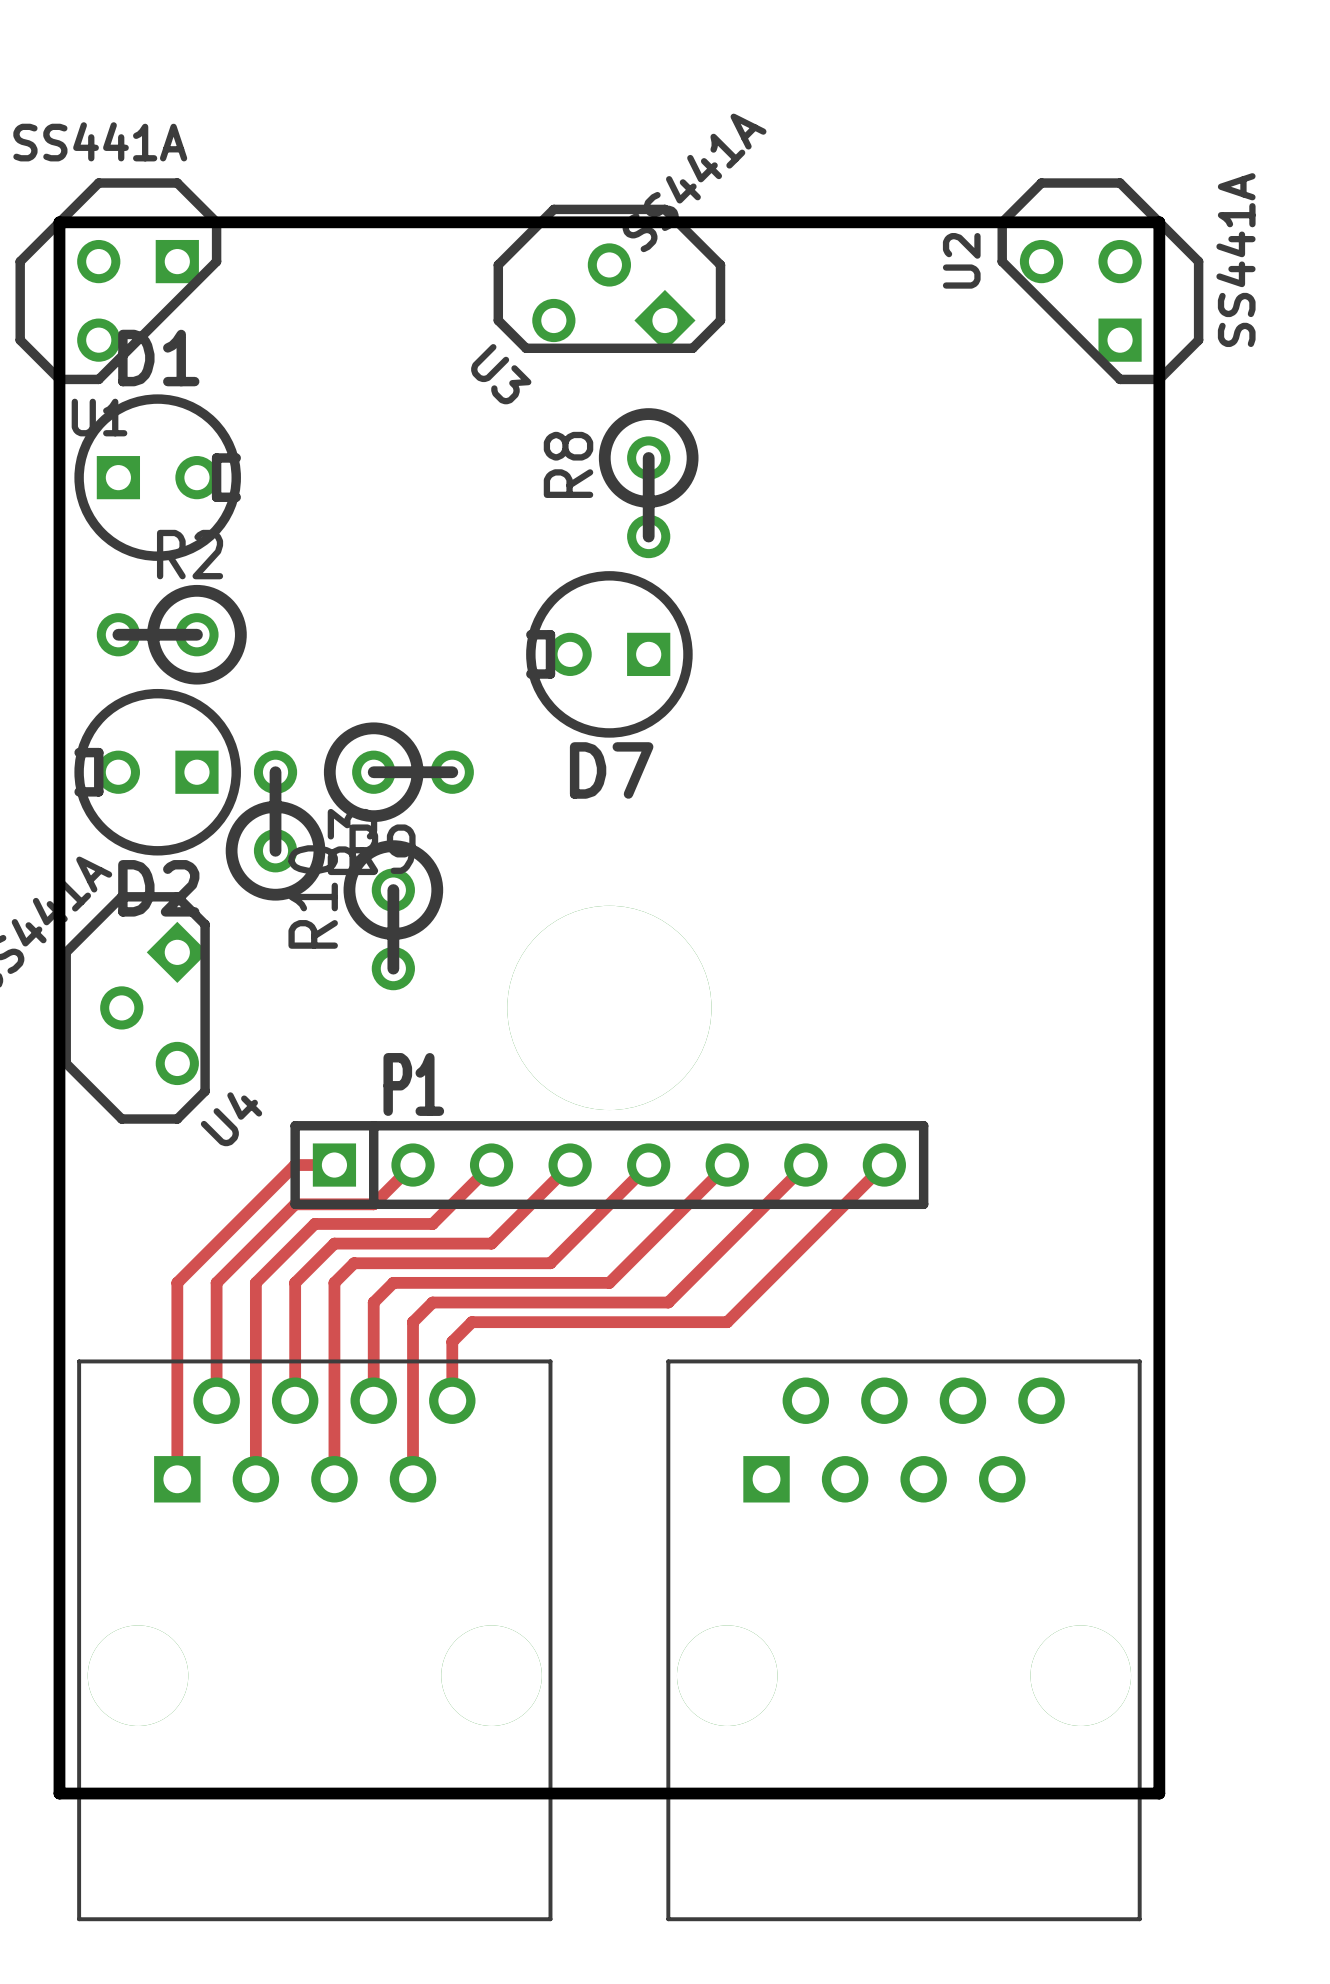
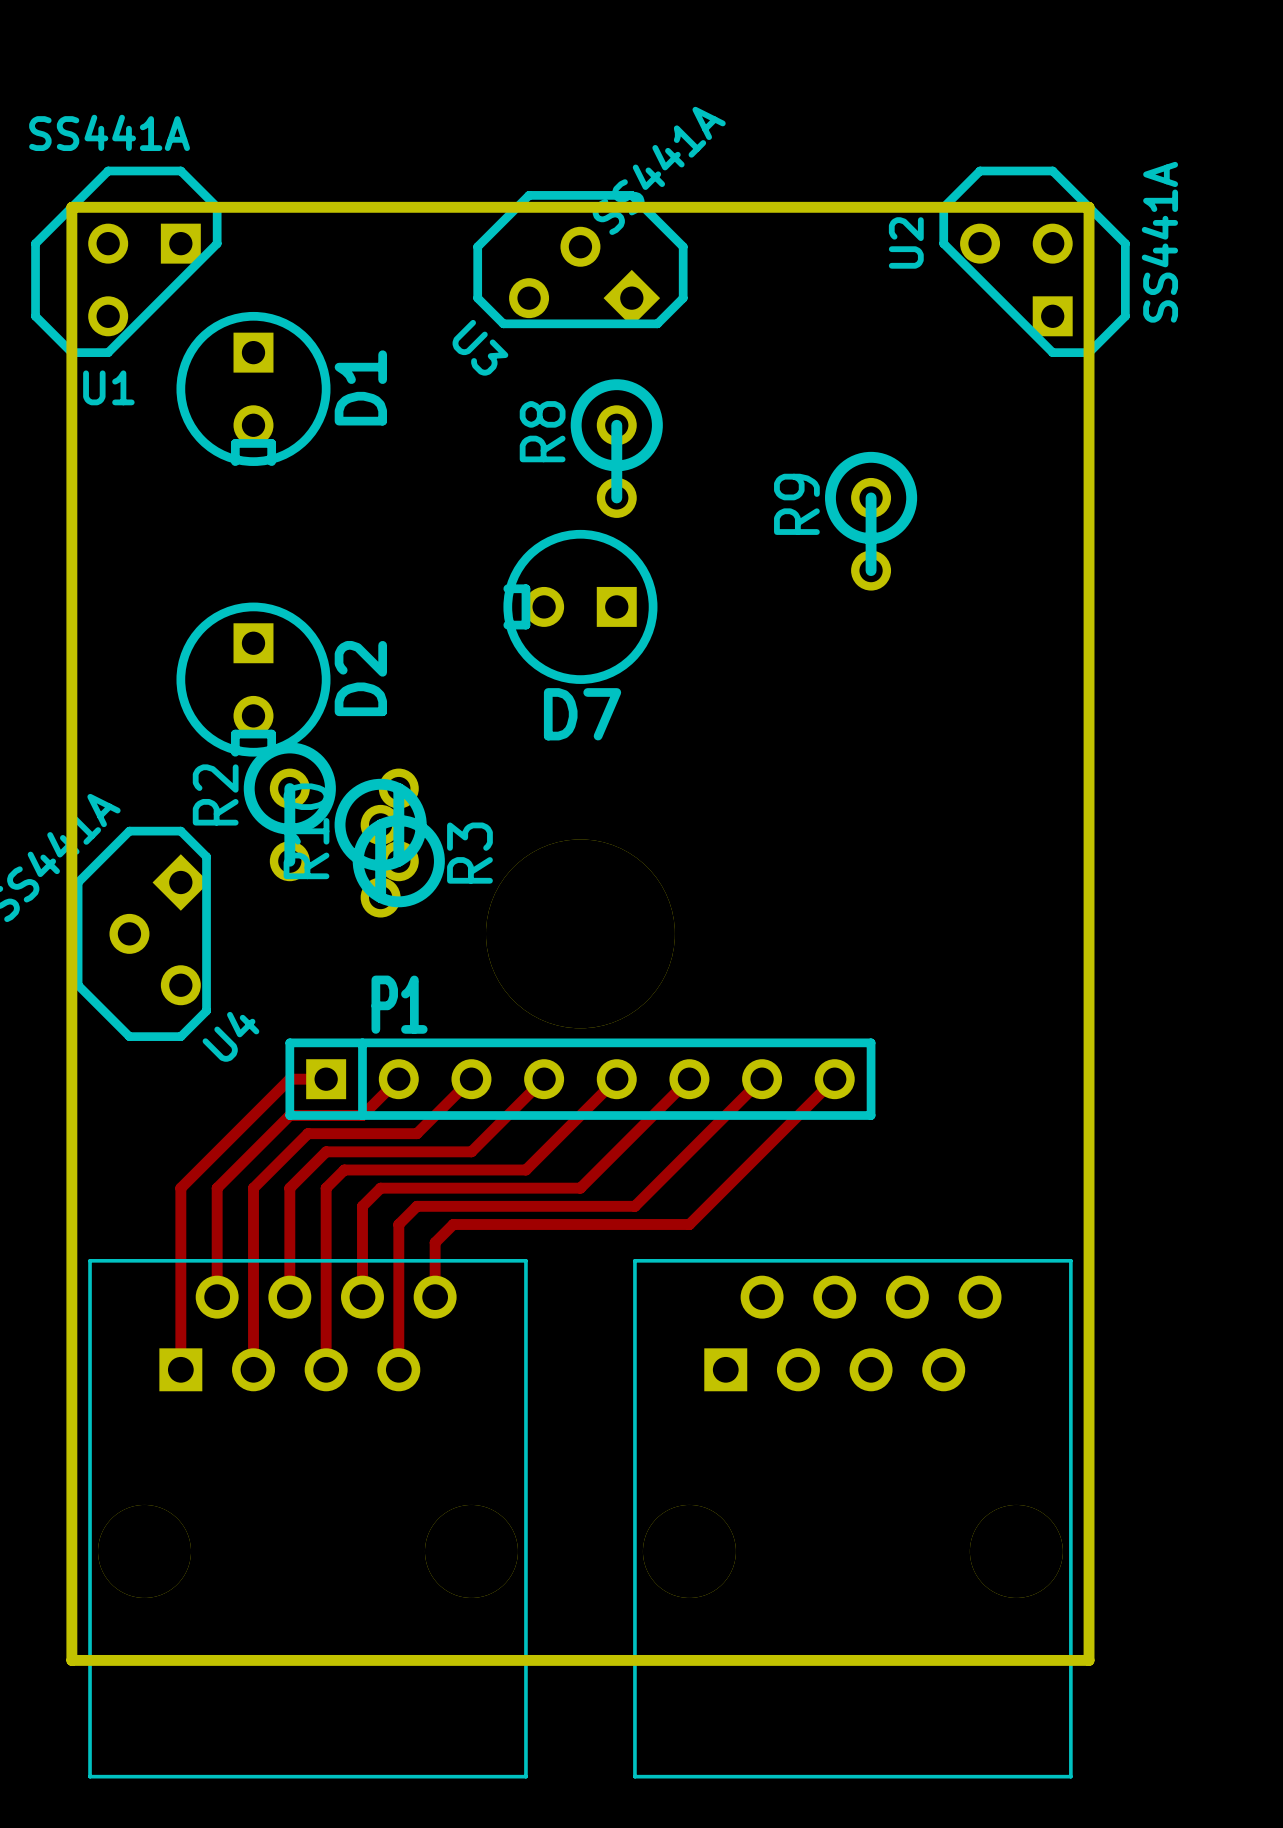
D1 rotation: 0° (157, 477) -> 90° clockwise (253, 388)
D1 position: (157, 477) -> (253, 388)
R2 rotation: 0° (171, 634) -> 90° counterclockwise (289, 811)
R2 position: (171, 634) -> (289, 811)
D2 rotation: 0° (157, 772) -> 90° counterclockwise (253, 679)
D2 position: (157, 772) -> (253, 679)
R9 rotation: 0° (398, 772) -> 90° clockwise (871, 521)
R9 position: (398, 772) -> (871, 521)
R3 position: (275, 825) -> (398, 837)

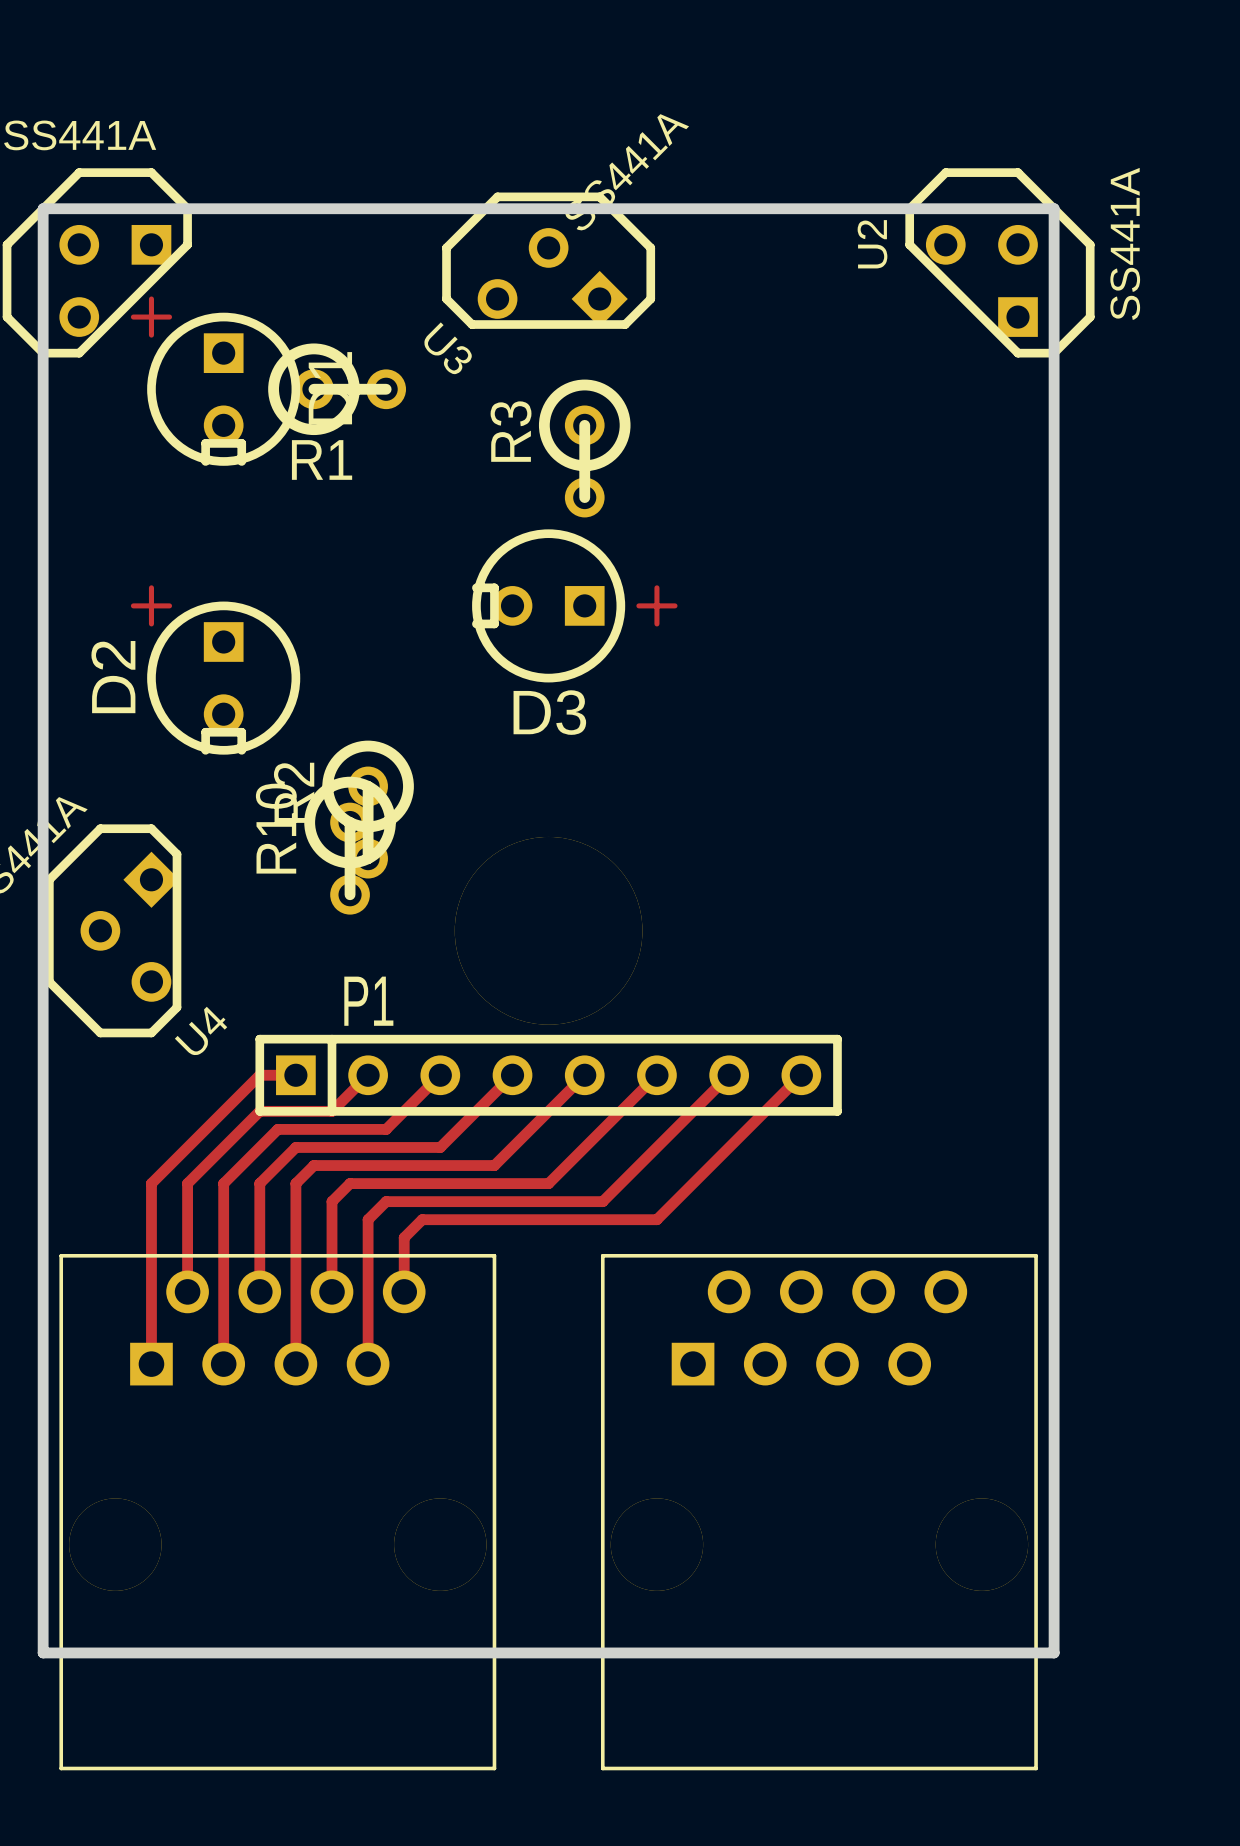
track: none -> (151, 298) (151, 335)
track: none -> (133, 317) (169, 317)
U1 name: U1 (108, 387) -> none
R1: none -> (337, 389)
R8 name: R8 (542, 431) -> R3 (511, 431)
R9: (871, 521) -> none
track: none -> (151, 587) (151, 623)
track: none -> (656, 587) (656, 623)
track: none -> (133, 605) (169, 605)
track: none -> (638, 605) (675, 605)
D2 name position: D2 (360, 678) -> D2 (113, 677)
D7 name: D7 (582, 714) -> D3 (549, 712)
R2 position: (289, 811) -> (368, 809)
R3: (398, 837) -> none

